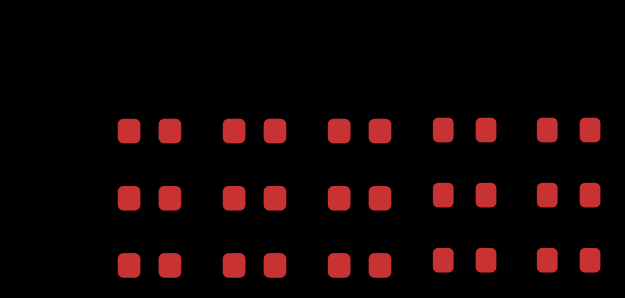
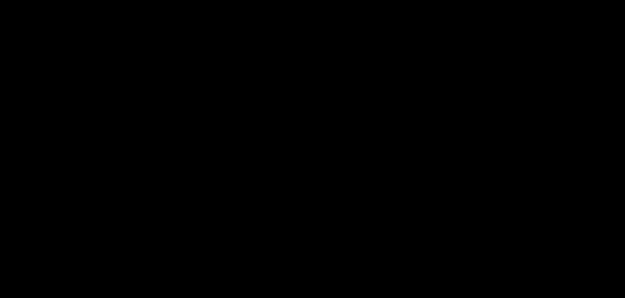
part: (464, 130) -> none
part: (568, 130) -> none
part: (149, 131) -> none
part: (254, 131) -> none
part: (359, 131) -> none
part: (464, 195) -> none
part: (568, 195) -> none
part: (149, 198) -> none
part: (254, 198) -> none
part: (359, 198) -> none
part: (464, 260) -> none
part: (568, 260) -> none
part: (149, 265) -> none
part: (254, 265) -> none
part: (359, 265) -> none

